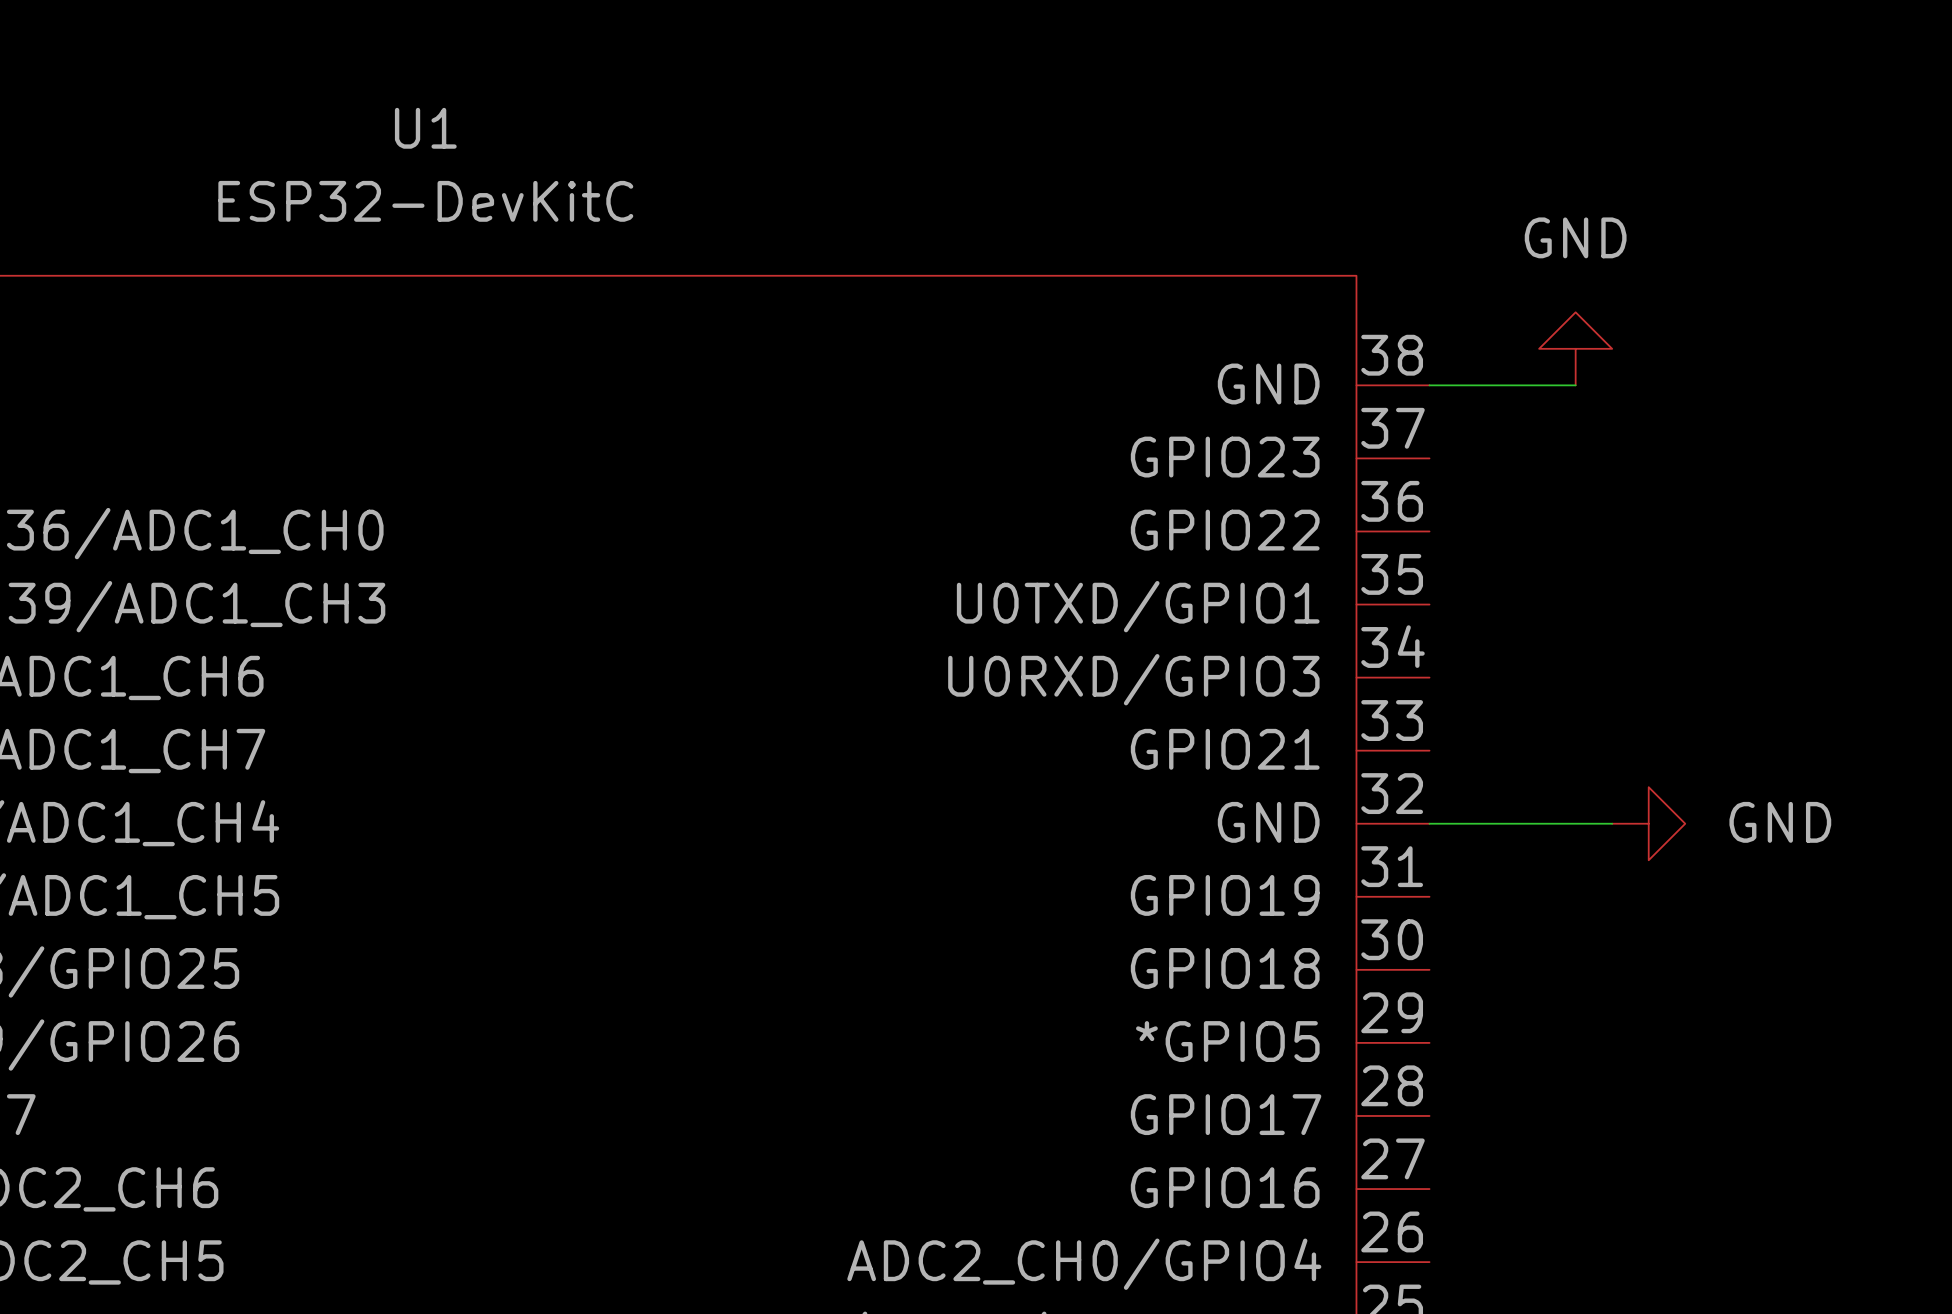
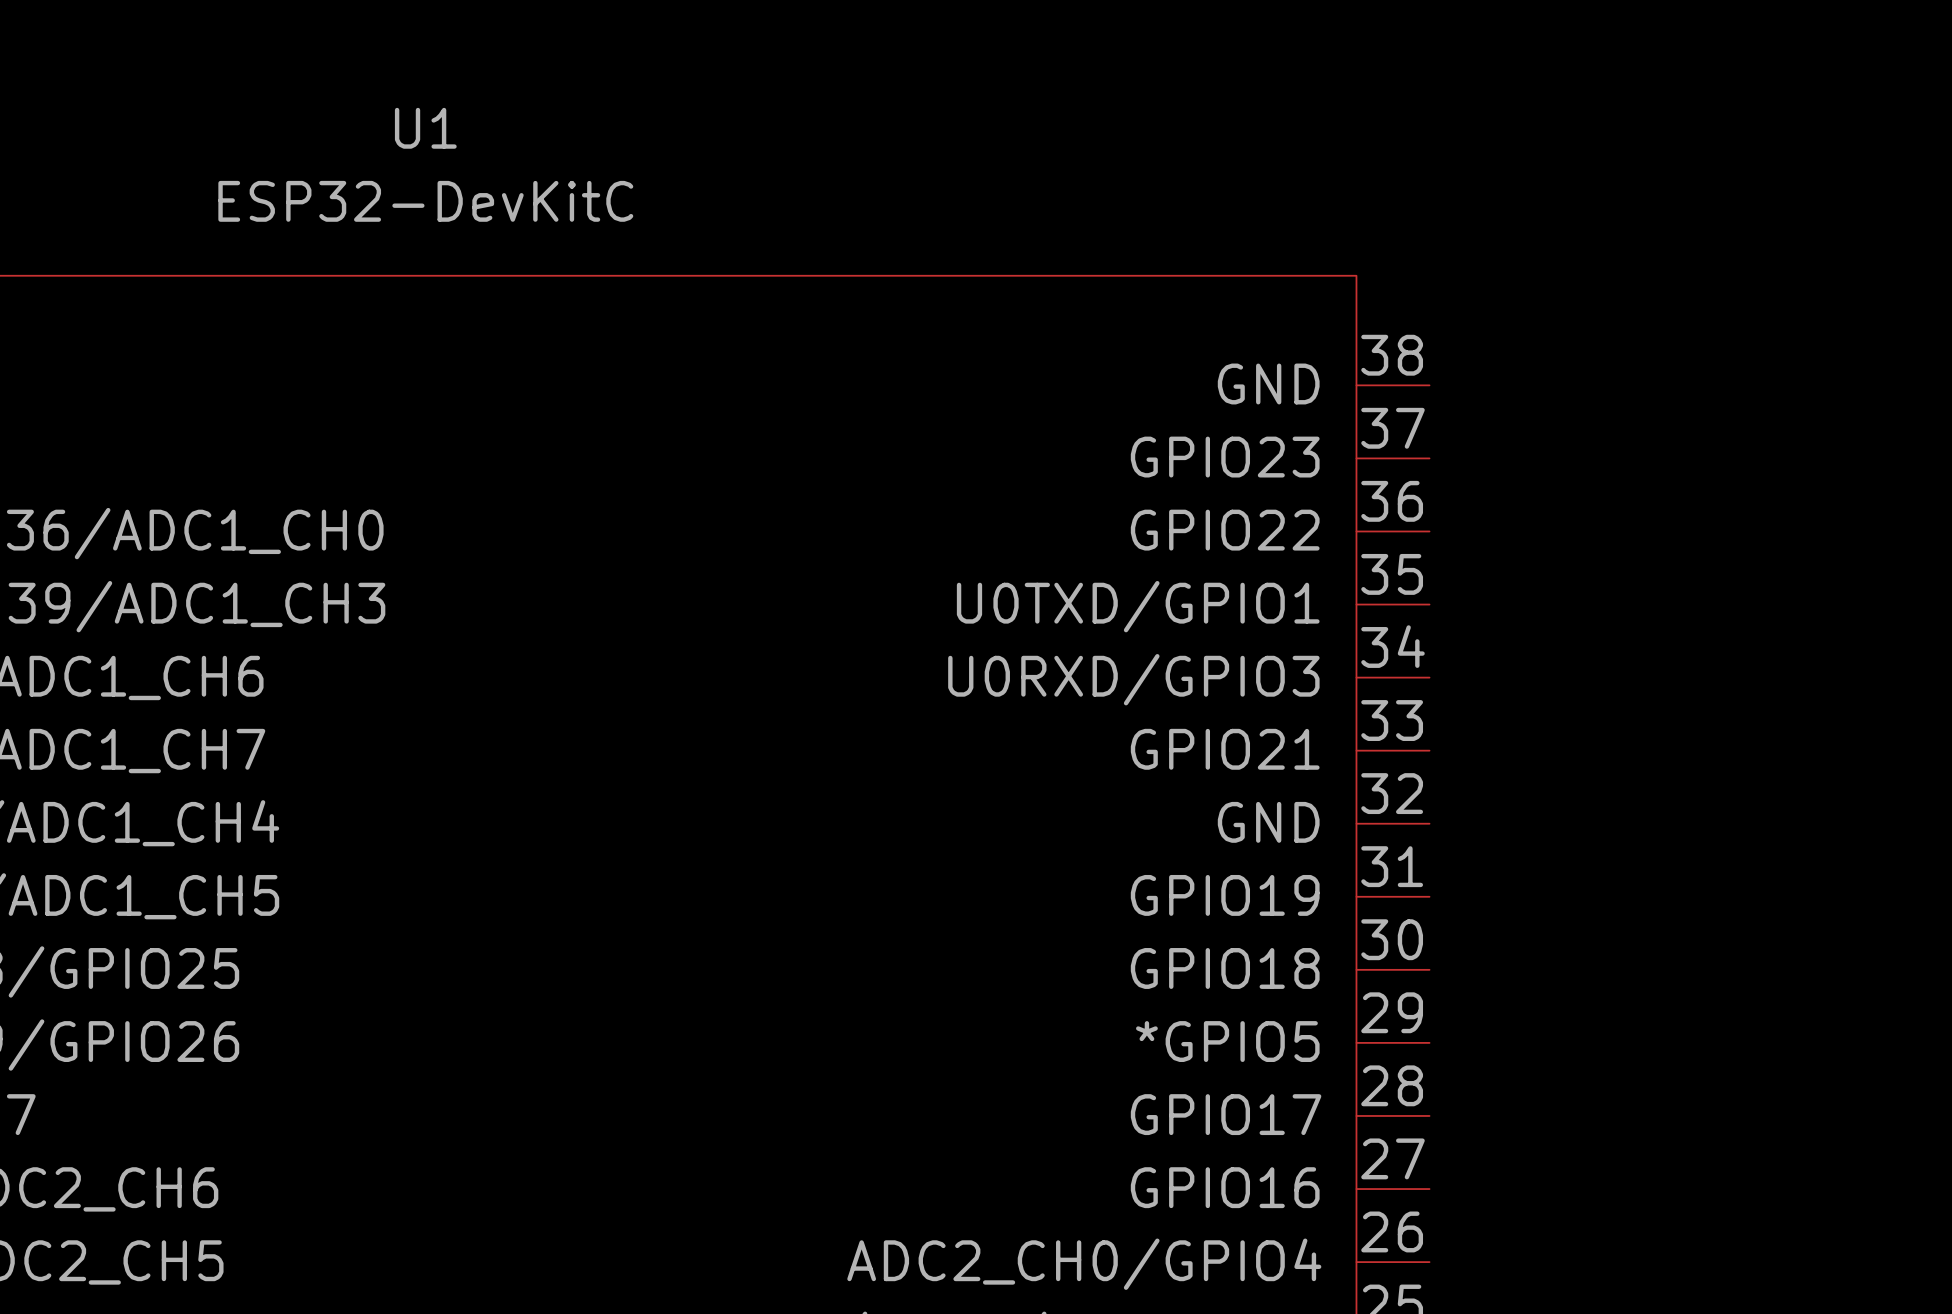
power symbol: GND (1575, 348) -> none
wire: (1429, 385) (1575, 385) -> none
wire: (1429, 823) (1612, 823) -> none
power symbol: GND (1648, 823) -> none

